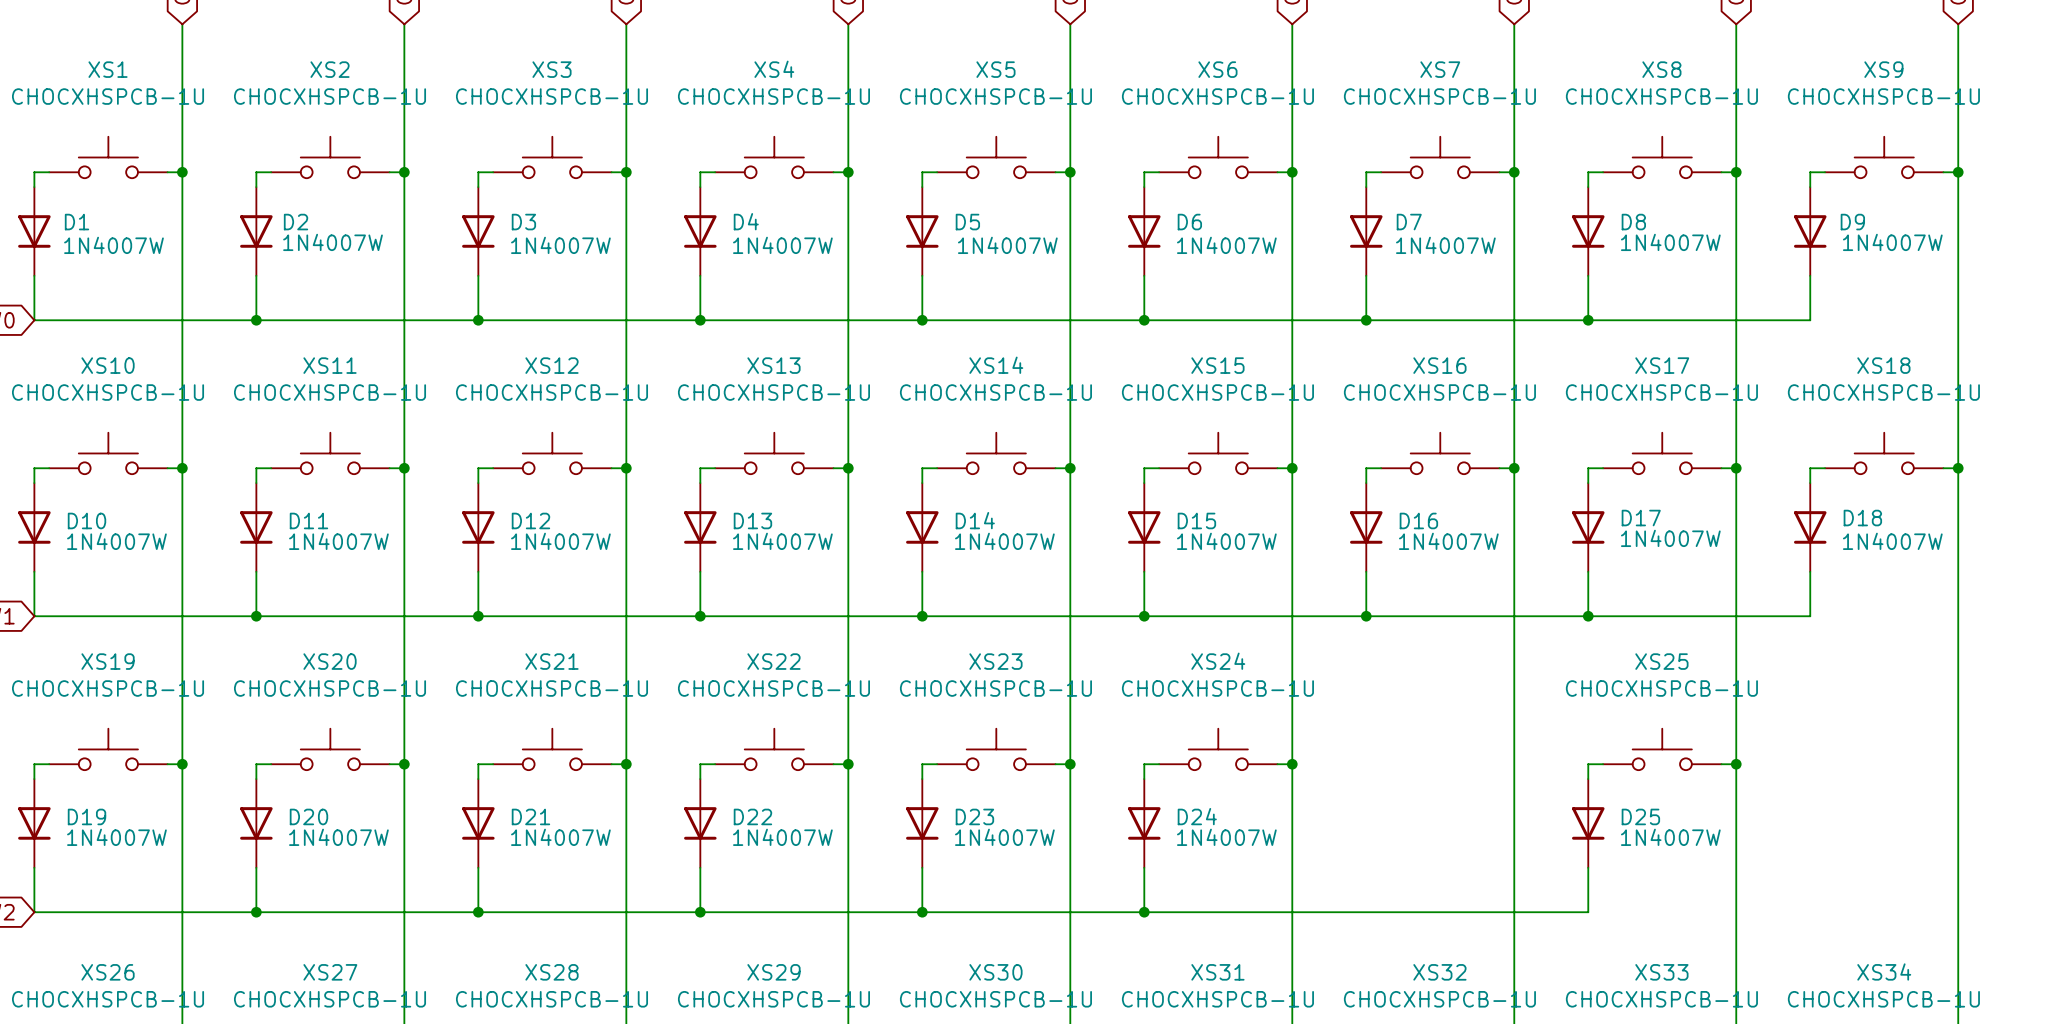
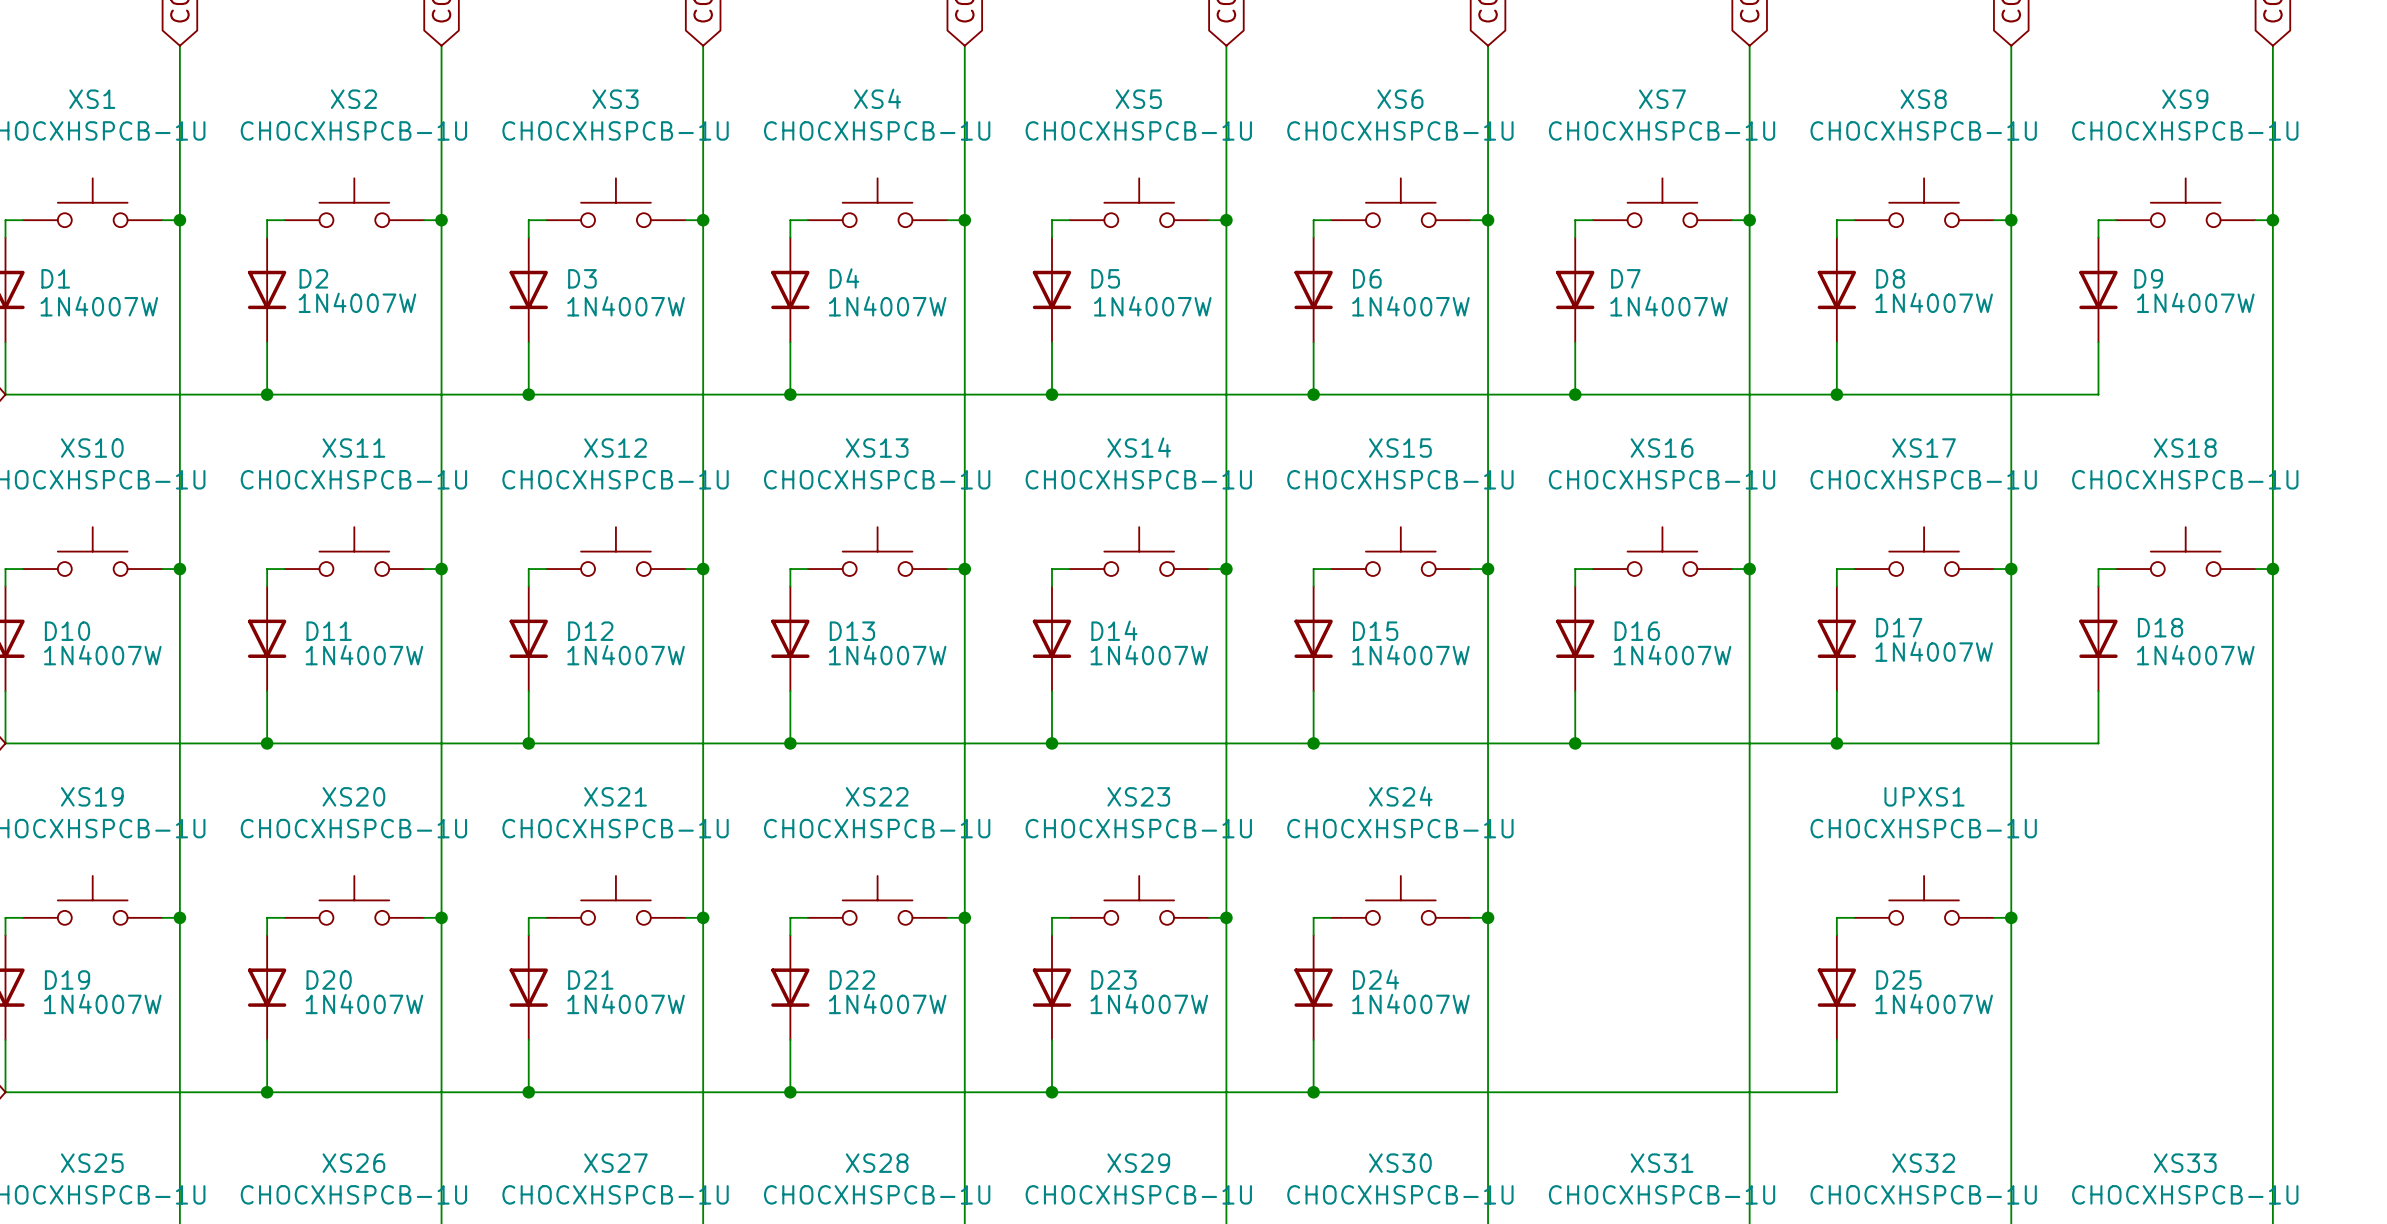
XS25 name: XS25 (1661, 661) -> UPXS1 (1924, 796)
XS34 name: XS34 (1884, 971) -> XS33 (2185, 1163)
XS26 name: XS26 (108, 972) -> XS25 (92, 1163)
XS27 name: XS27 (330, 972) -> XS26 (353, 1163)
XS28 name: XS28 (551, 972) -> XS27 (615, 1163)
XS29 name: XS29 (773, 972) -> XS28 (877, 1163)
XS30 name: XS30 (995, 972) -> XS29 (1138, 1163)
XS31 name: XS31 (1217, 972) -> XS30 (1400, 1163)
XS32 name: XS32 (1439, 972) -> XS31 (1662, 1163)
XS33 name: XS33 (1661, 972) -> XS32 (1923, 1163)

